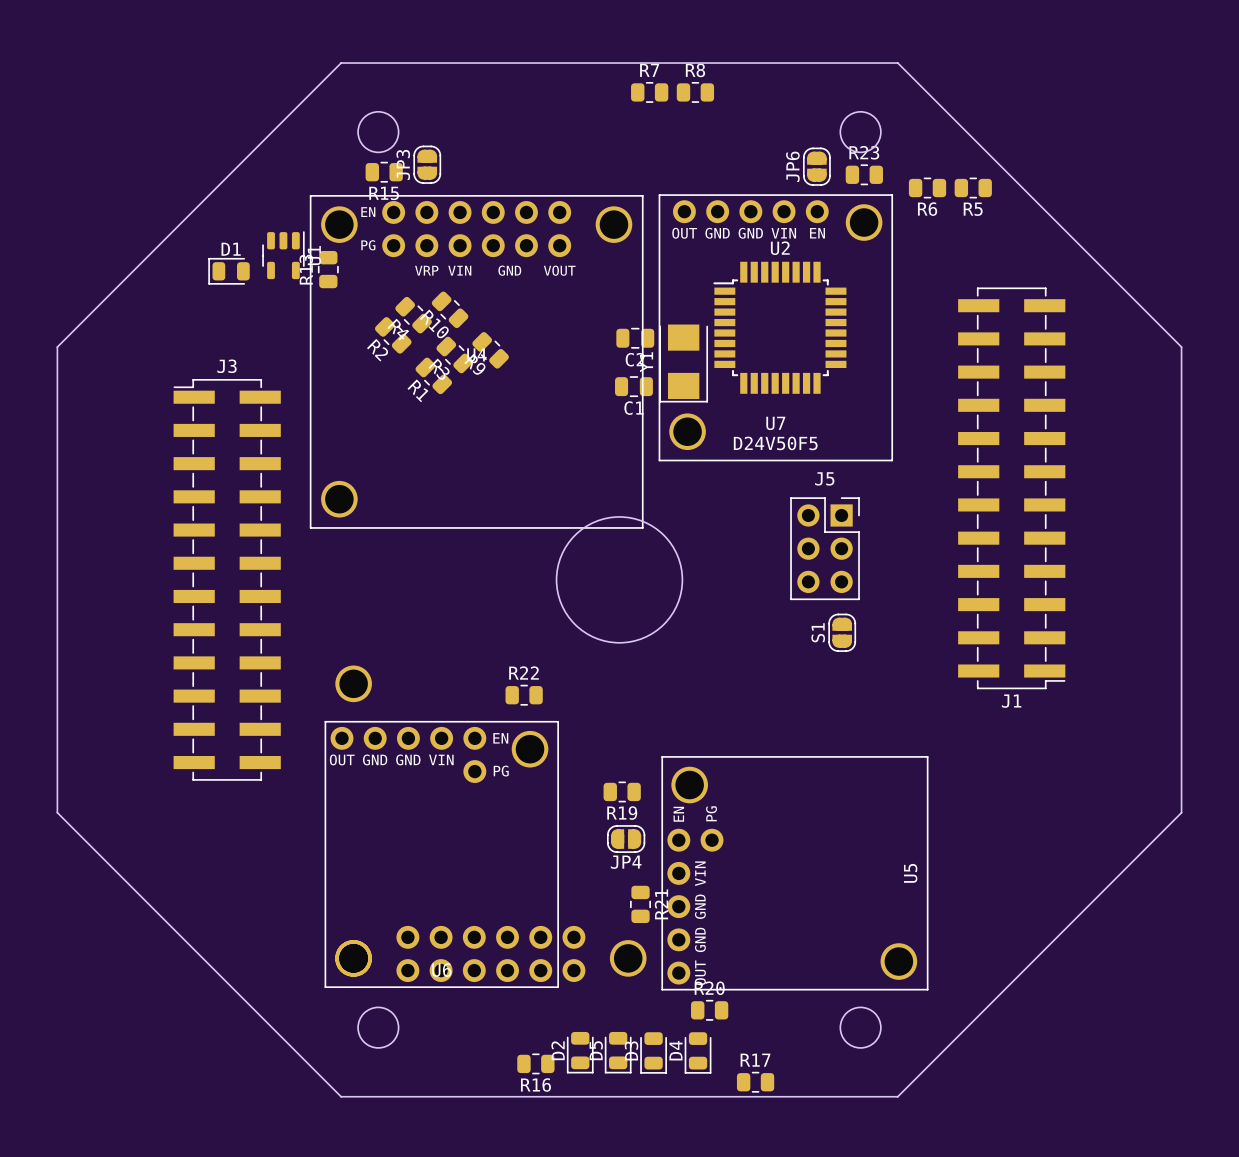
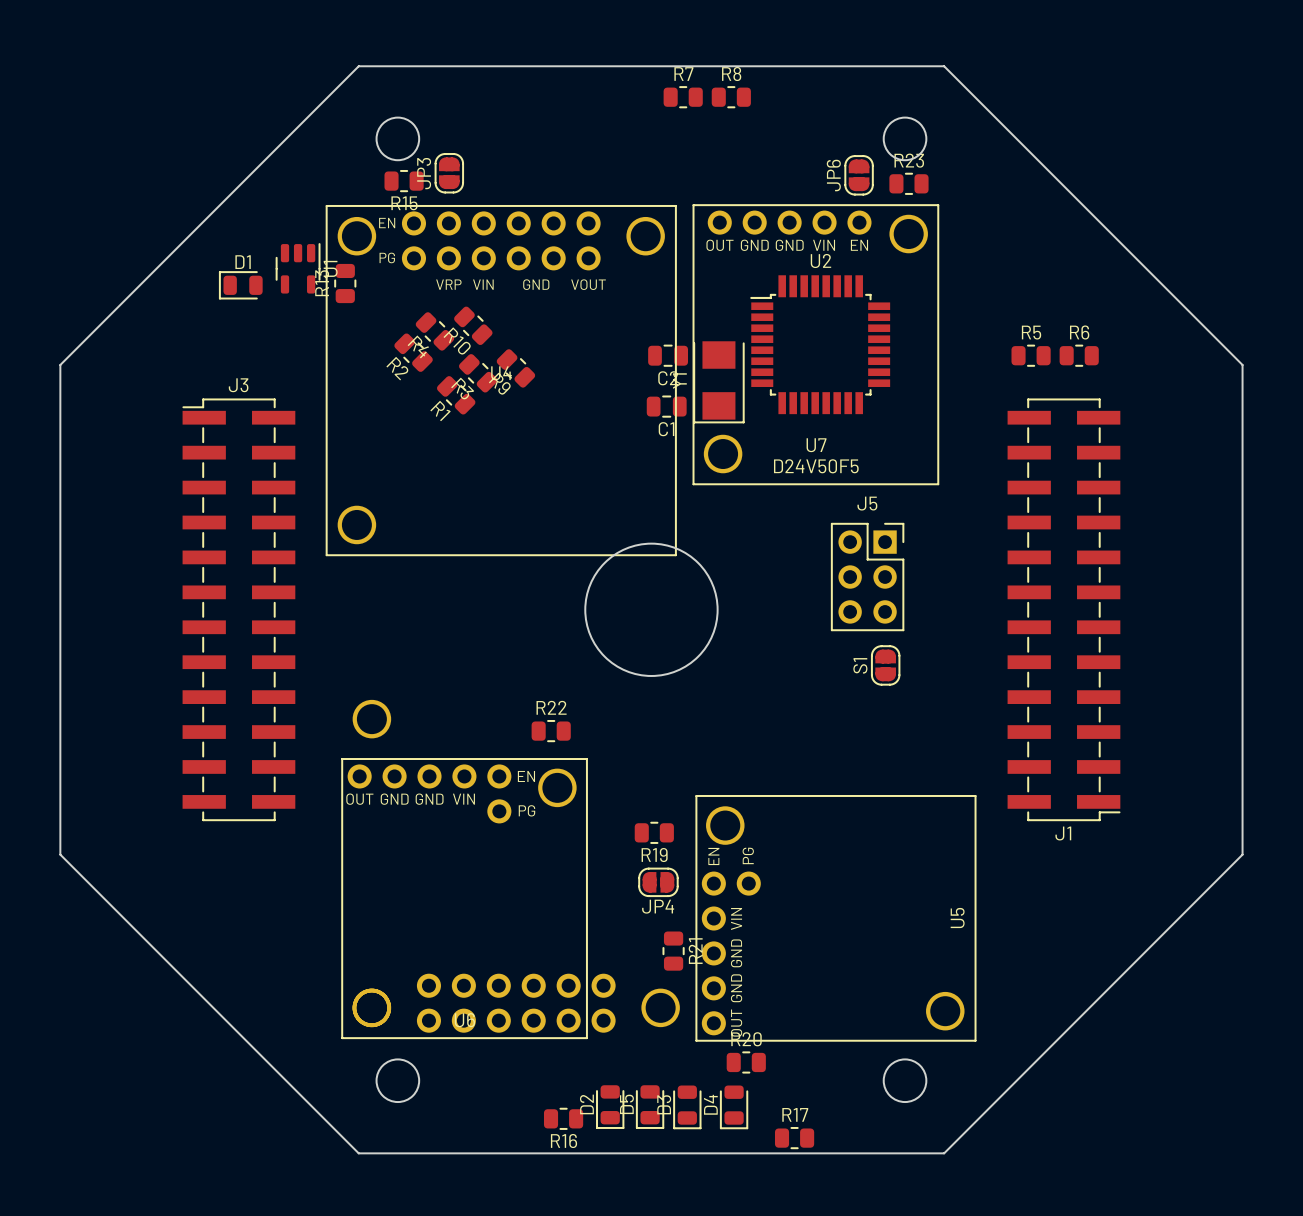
R6 position: (927, 188) -> (1079, 355)
R5 position: (973, 188) -> (1031, 355)
R6 name position: R6 (927, 209) -> R6 (1079, 332)
R5 name position: R5 (973, 209) -> R5 (1031, 332)
J1 position: (1011, 488) -> (1063, 609)

